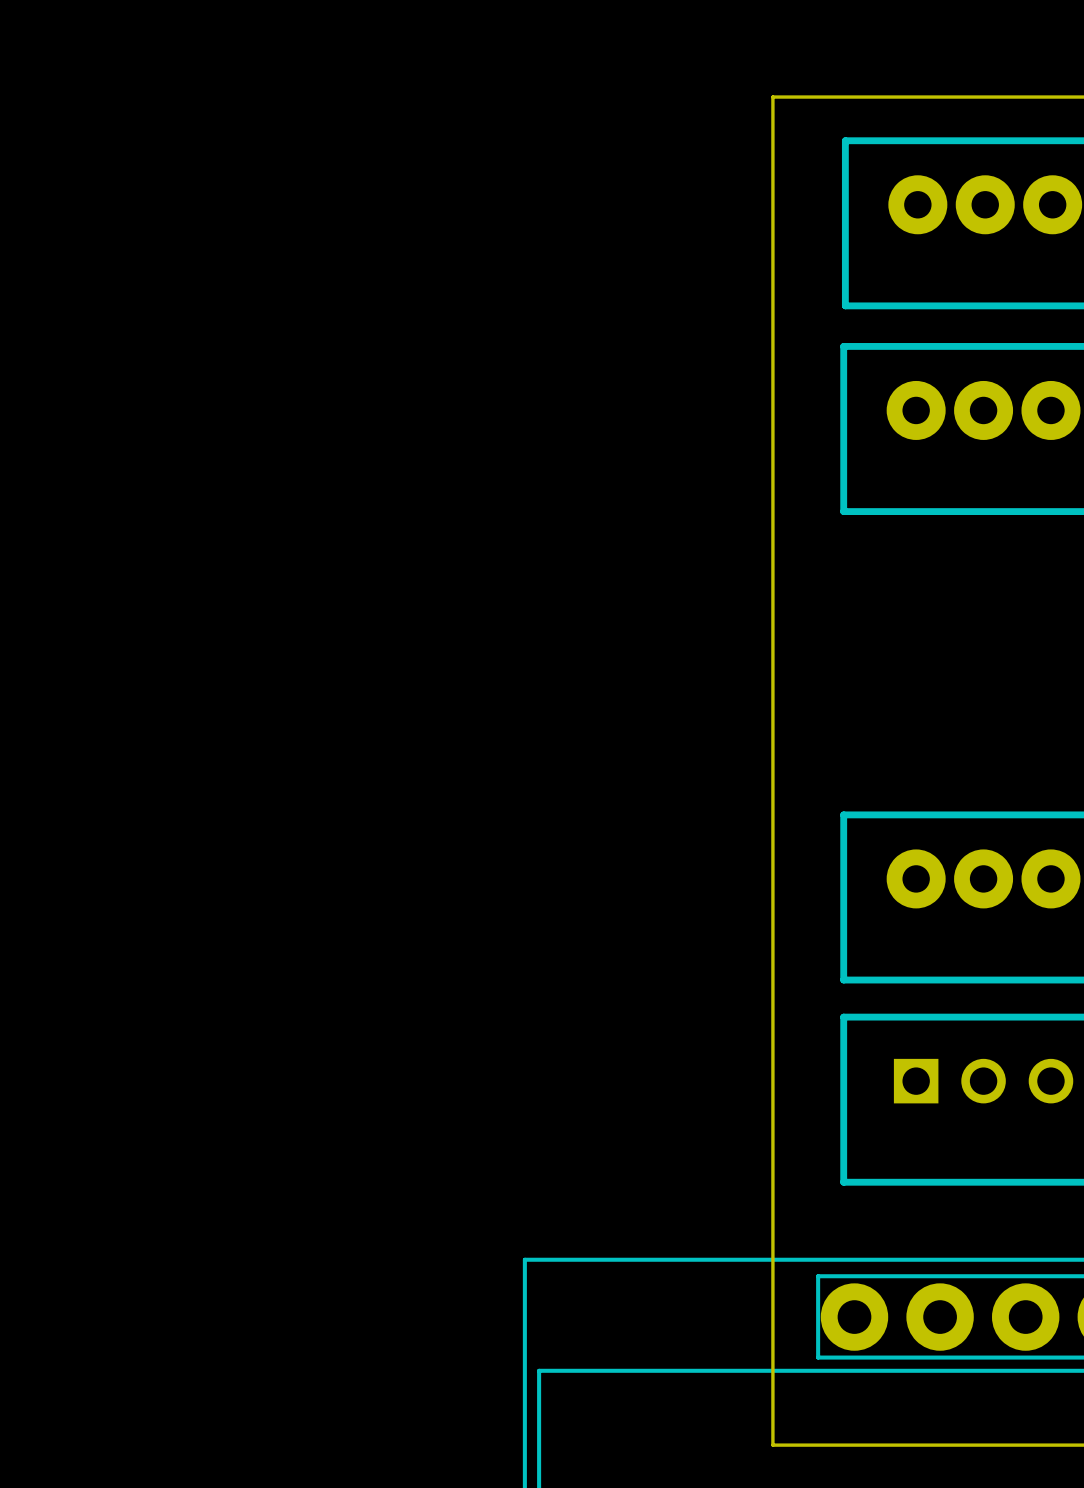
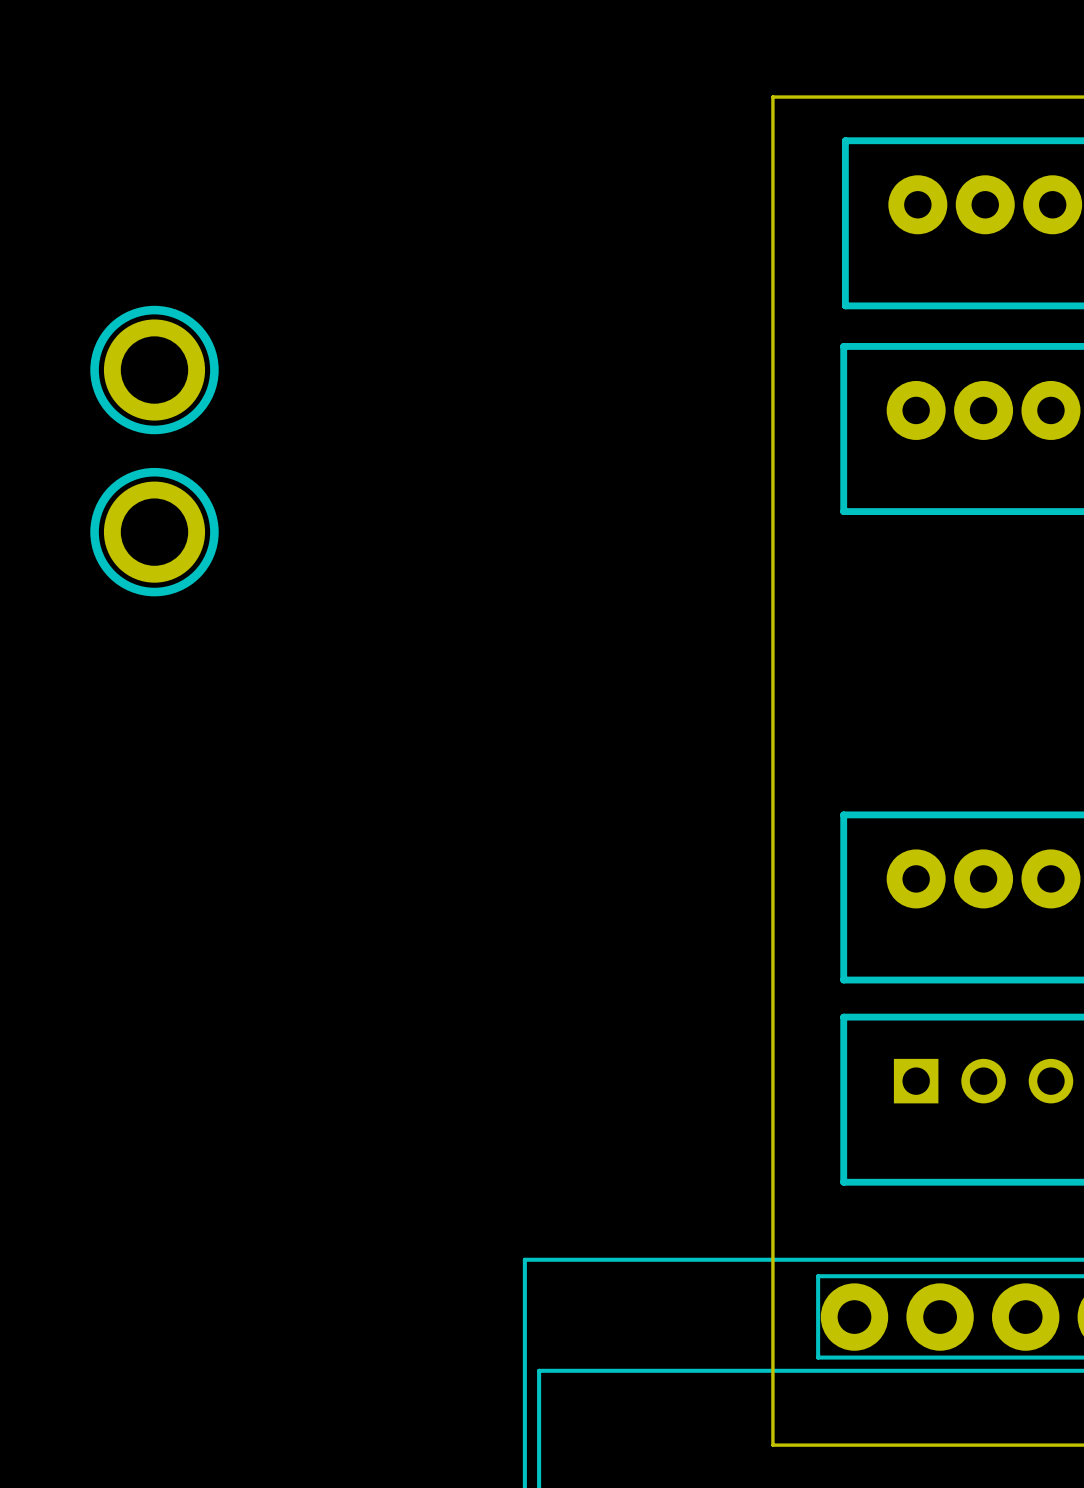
part: none -> (154, 370)
part: none -> (154, 532)

